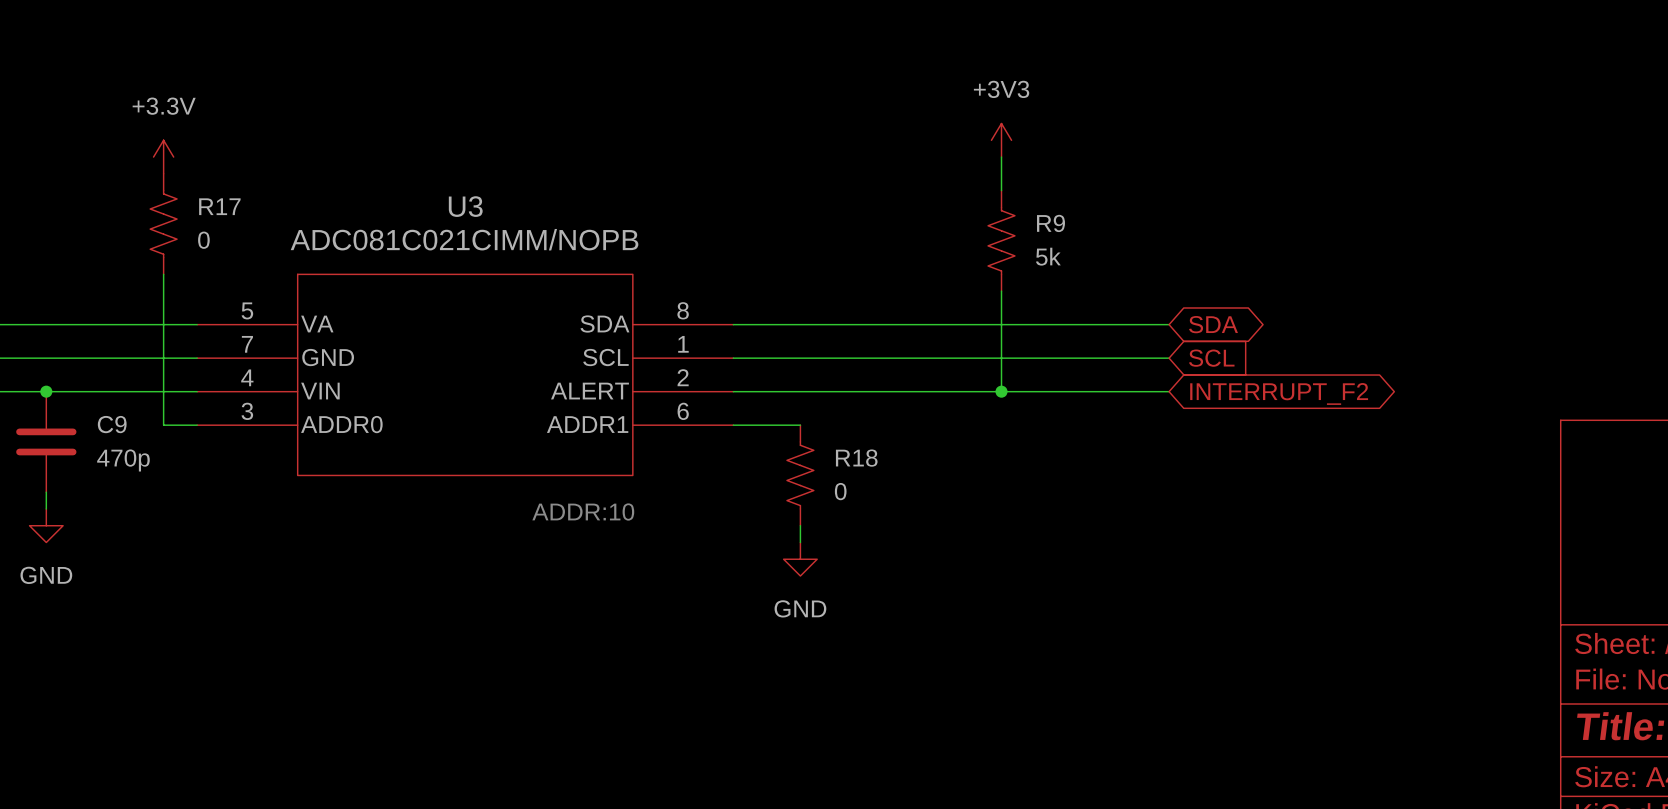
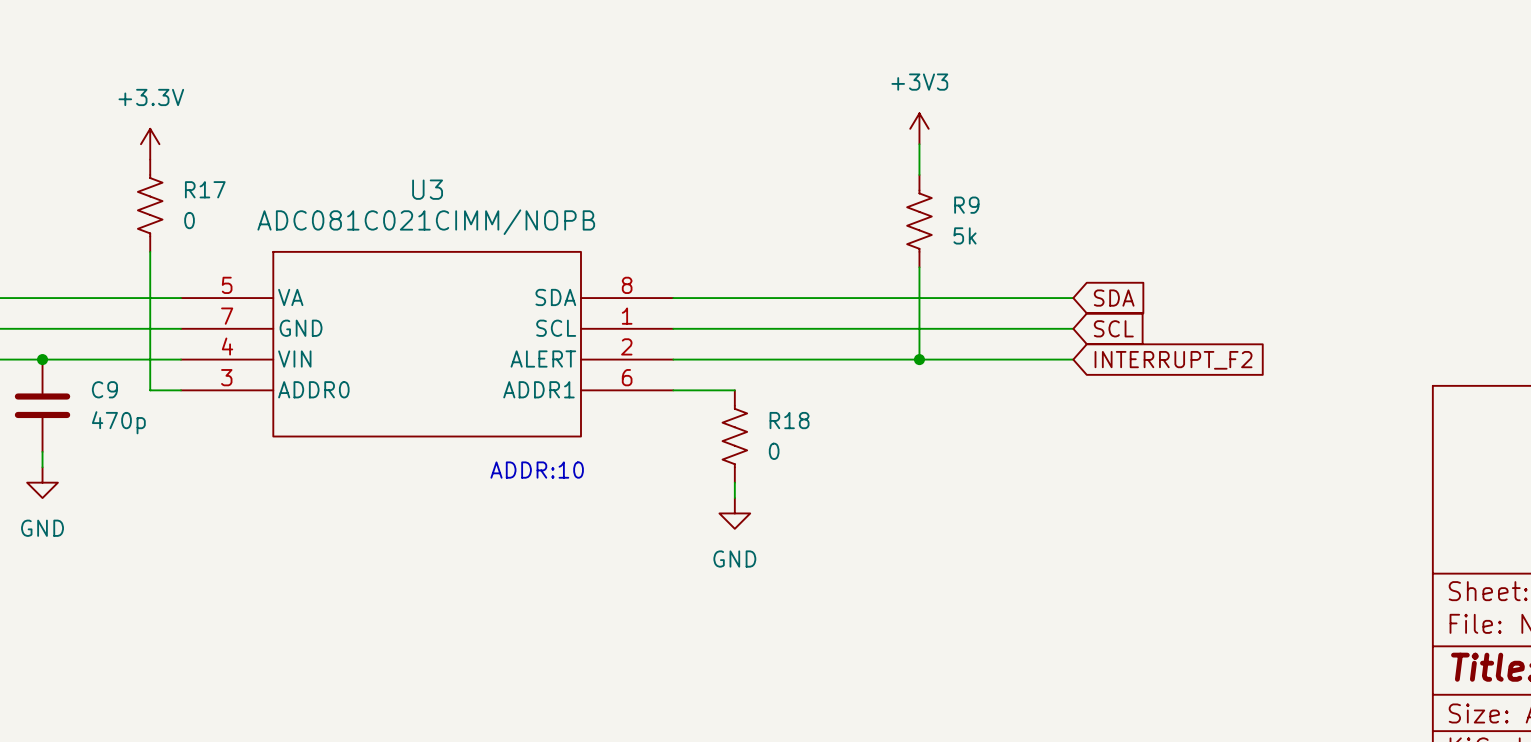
global label shape: bidirectional (1213, 324) -> input (1114, 298)
global label shape: bidirectional (1279, 393) -> input (1173, 360)

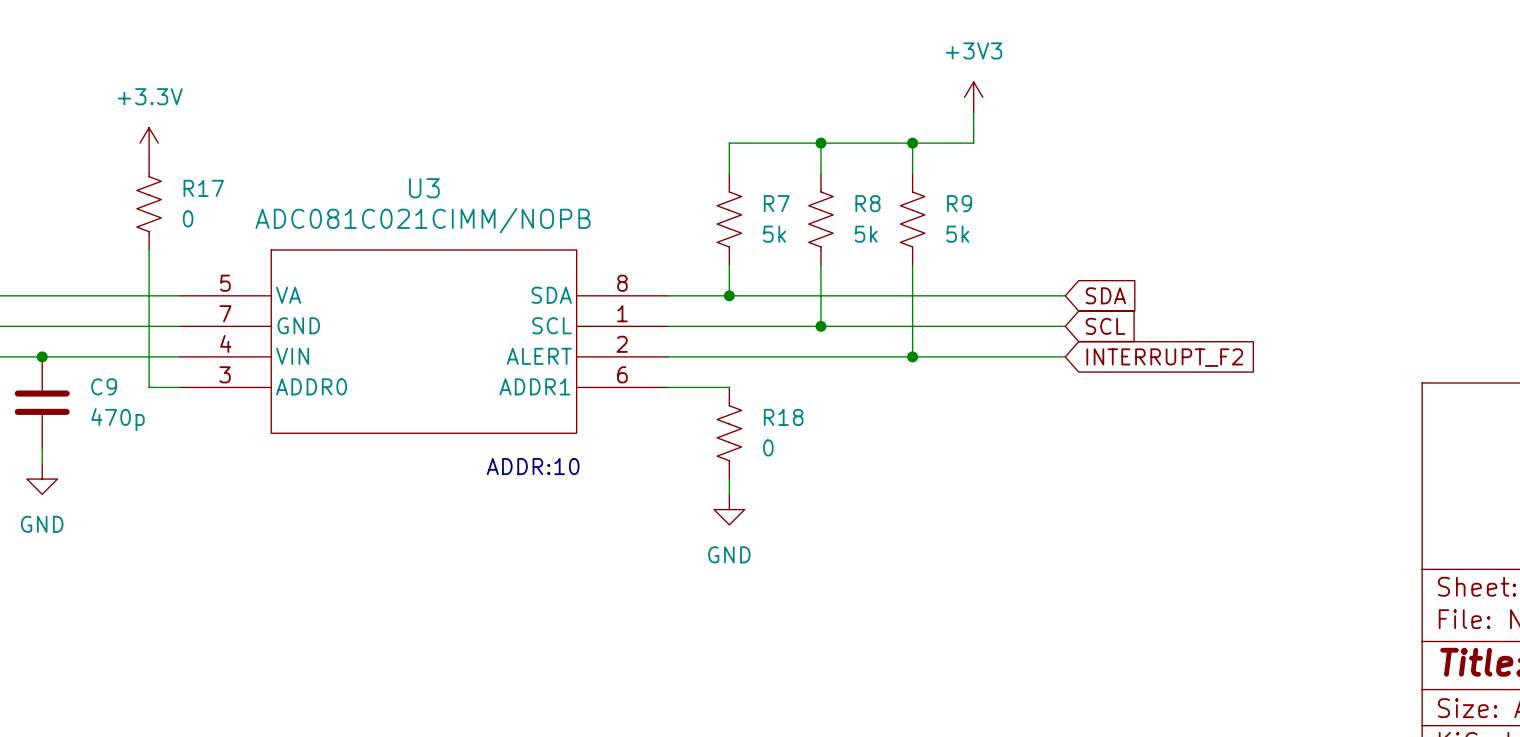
wire: none -> (973, 112) (973, 143) (729, 143) (729, 173)
power symbol position: +3V3 (919, 128) -> +3V3 (973, 97)
wire: none -> (820, 143) (820, 173)
junction: none -> (820, 143)
junction: none -> (912, 143)
R7: none -> 5k (729, 219)
R8: none -> 5k (820, 219)
wire: none -> (729, 265) (729, 295)
wire: none -> (820, 265) (820, 326)
junction: none -> (729, 295)
junction: none -> (820, 326)

